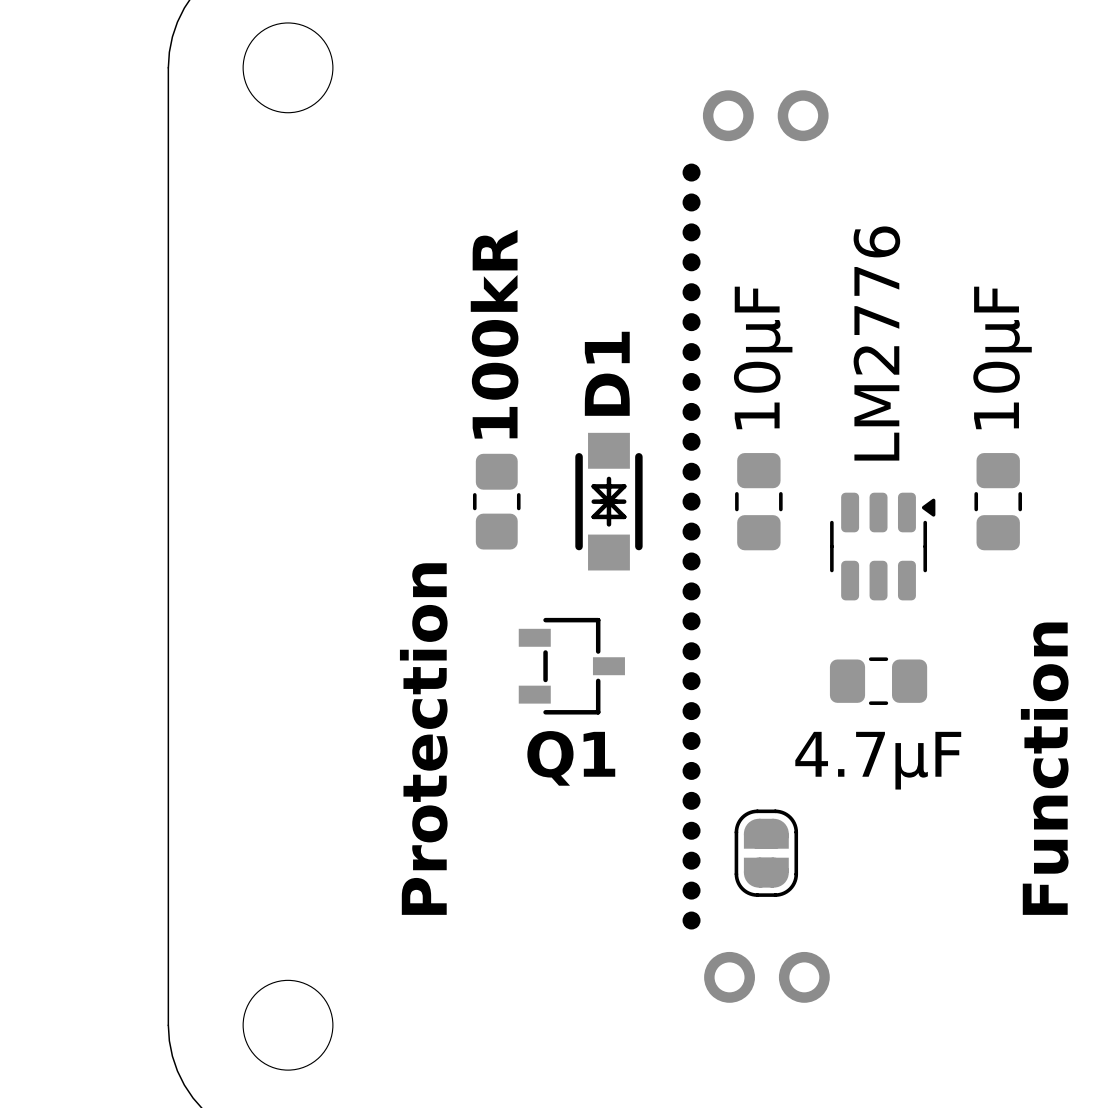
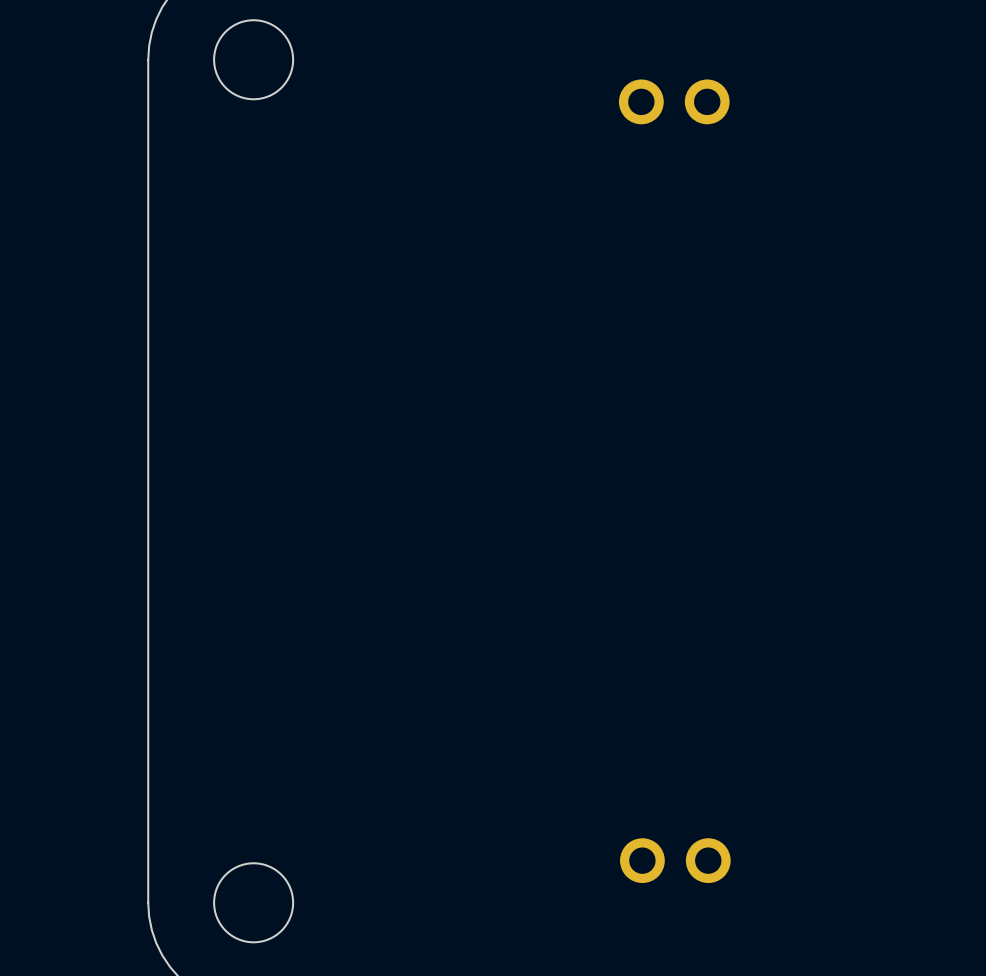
drawing: [682, 163, 701, 930] -> none
part: 100kR (496, 501) -> none
D1: (608, 501) -> none
part: 10µF (758, 501) -> none
part: 10µF (998, 501) -> none
part: LM2776 (882, 546) -> none
Q1: (571, 666) -> none
part: 4.7µF (878, 681) -> none
text: Protection (423, 739) -> none
text: Function (1044, 768) -> none
part: (766, 853) -> none

